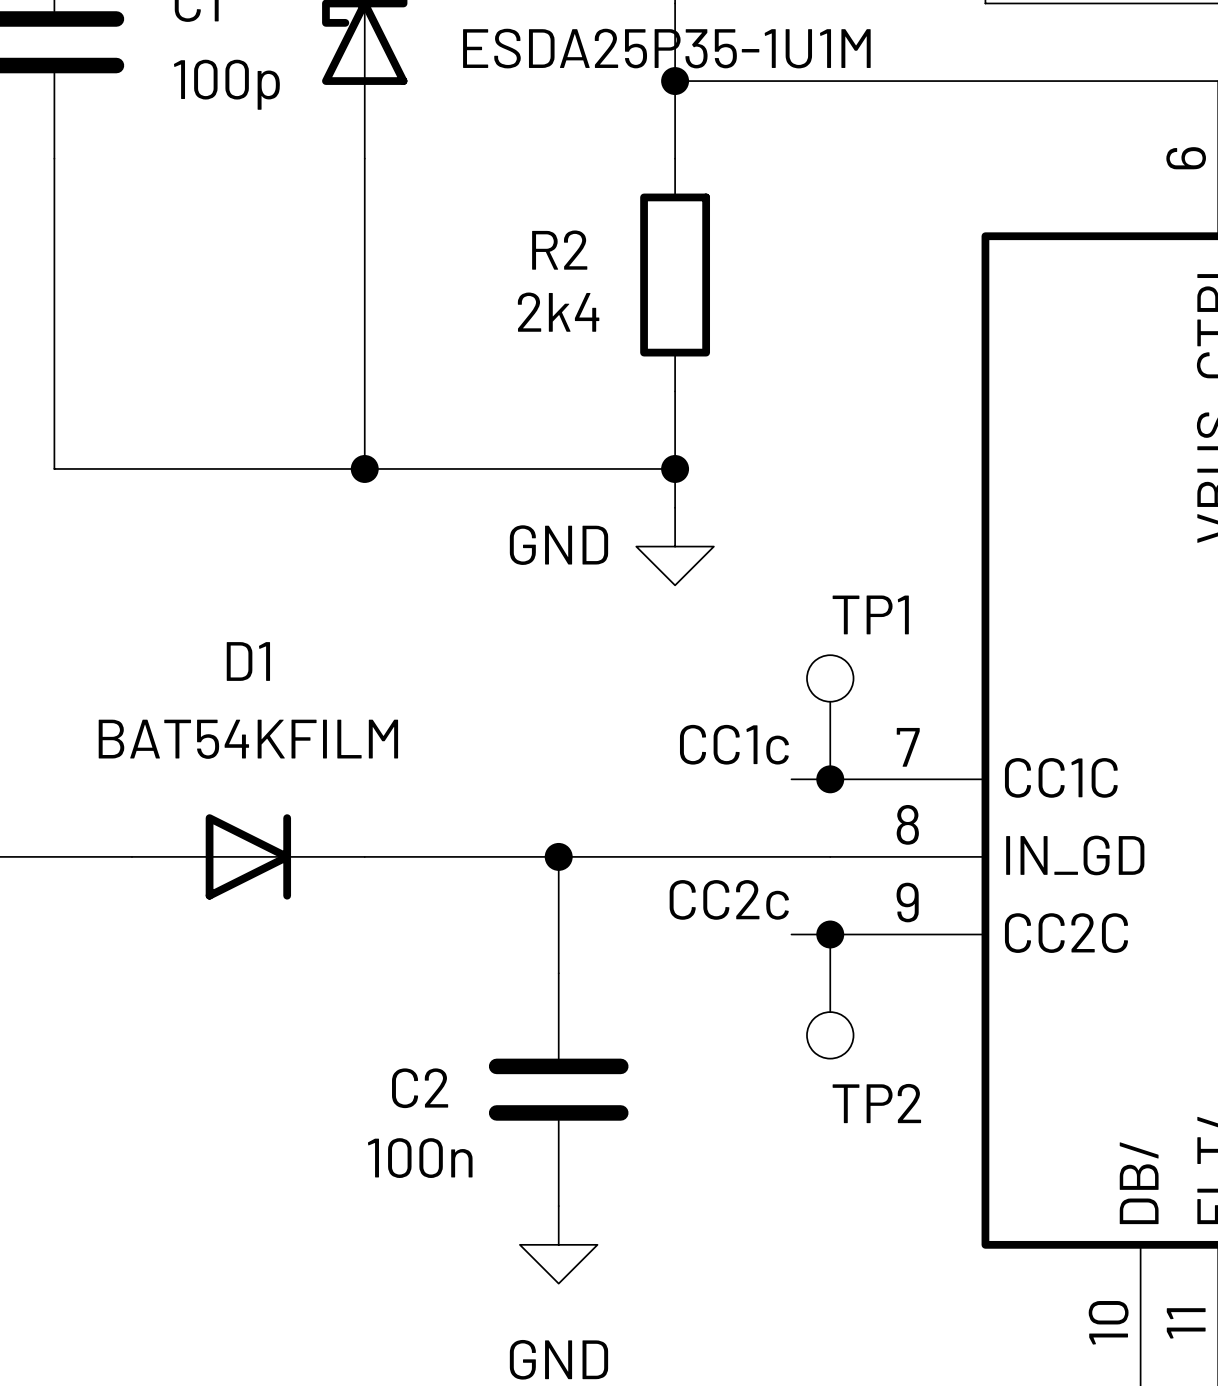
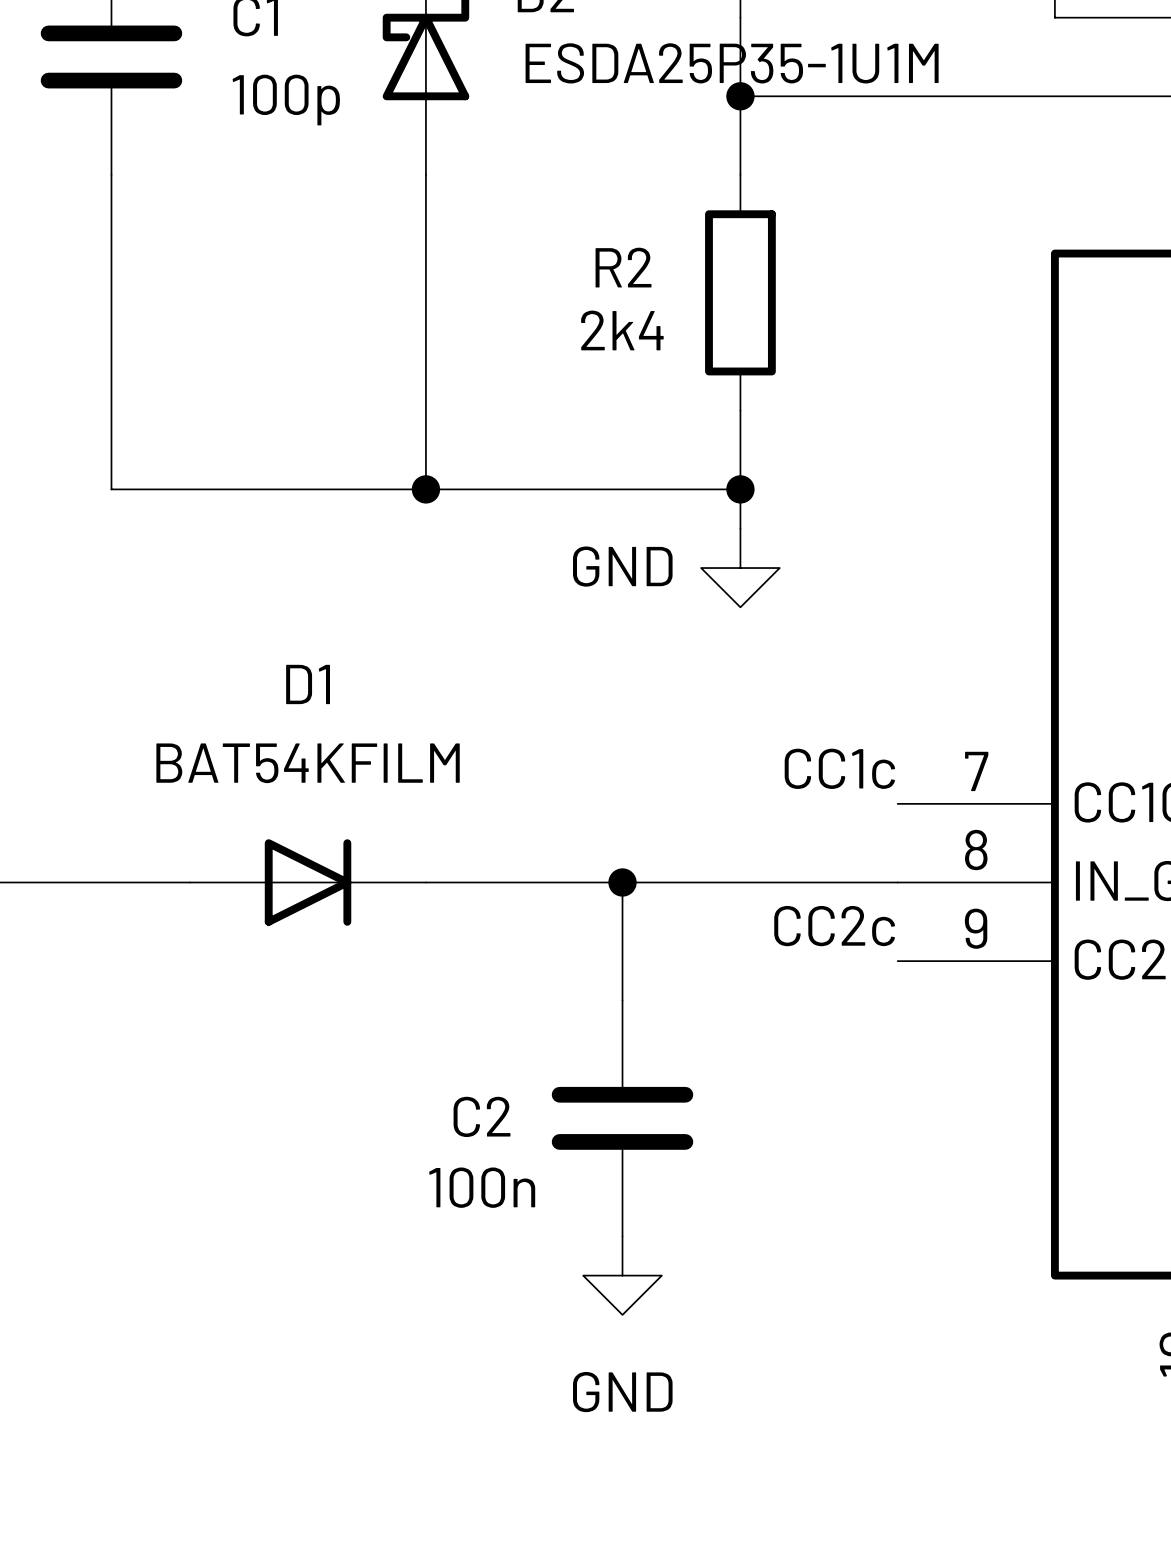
TP1: (830, 717) -> none
label position: CC1c (734, 744) -> CC1c (839, 768)
wire: (791, 779) (830, 779) -> none
junction: (830, 779) -> none
label position: CC2c (729, 899) -> CC2c (834, 926)
wire: (791, 934) (830, 934) -> none
junction: (830, 934) -> none
TP2: (830, 996) -> none

